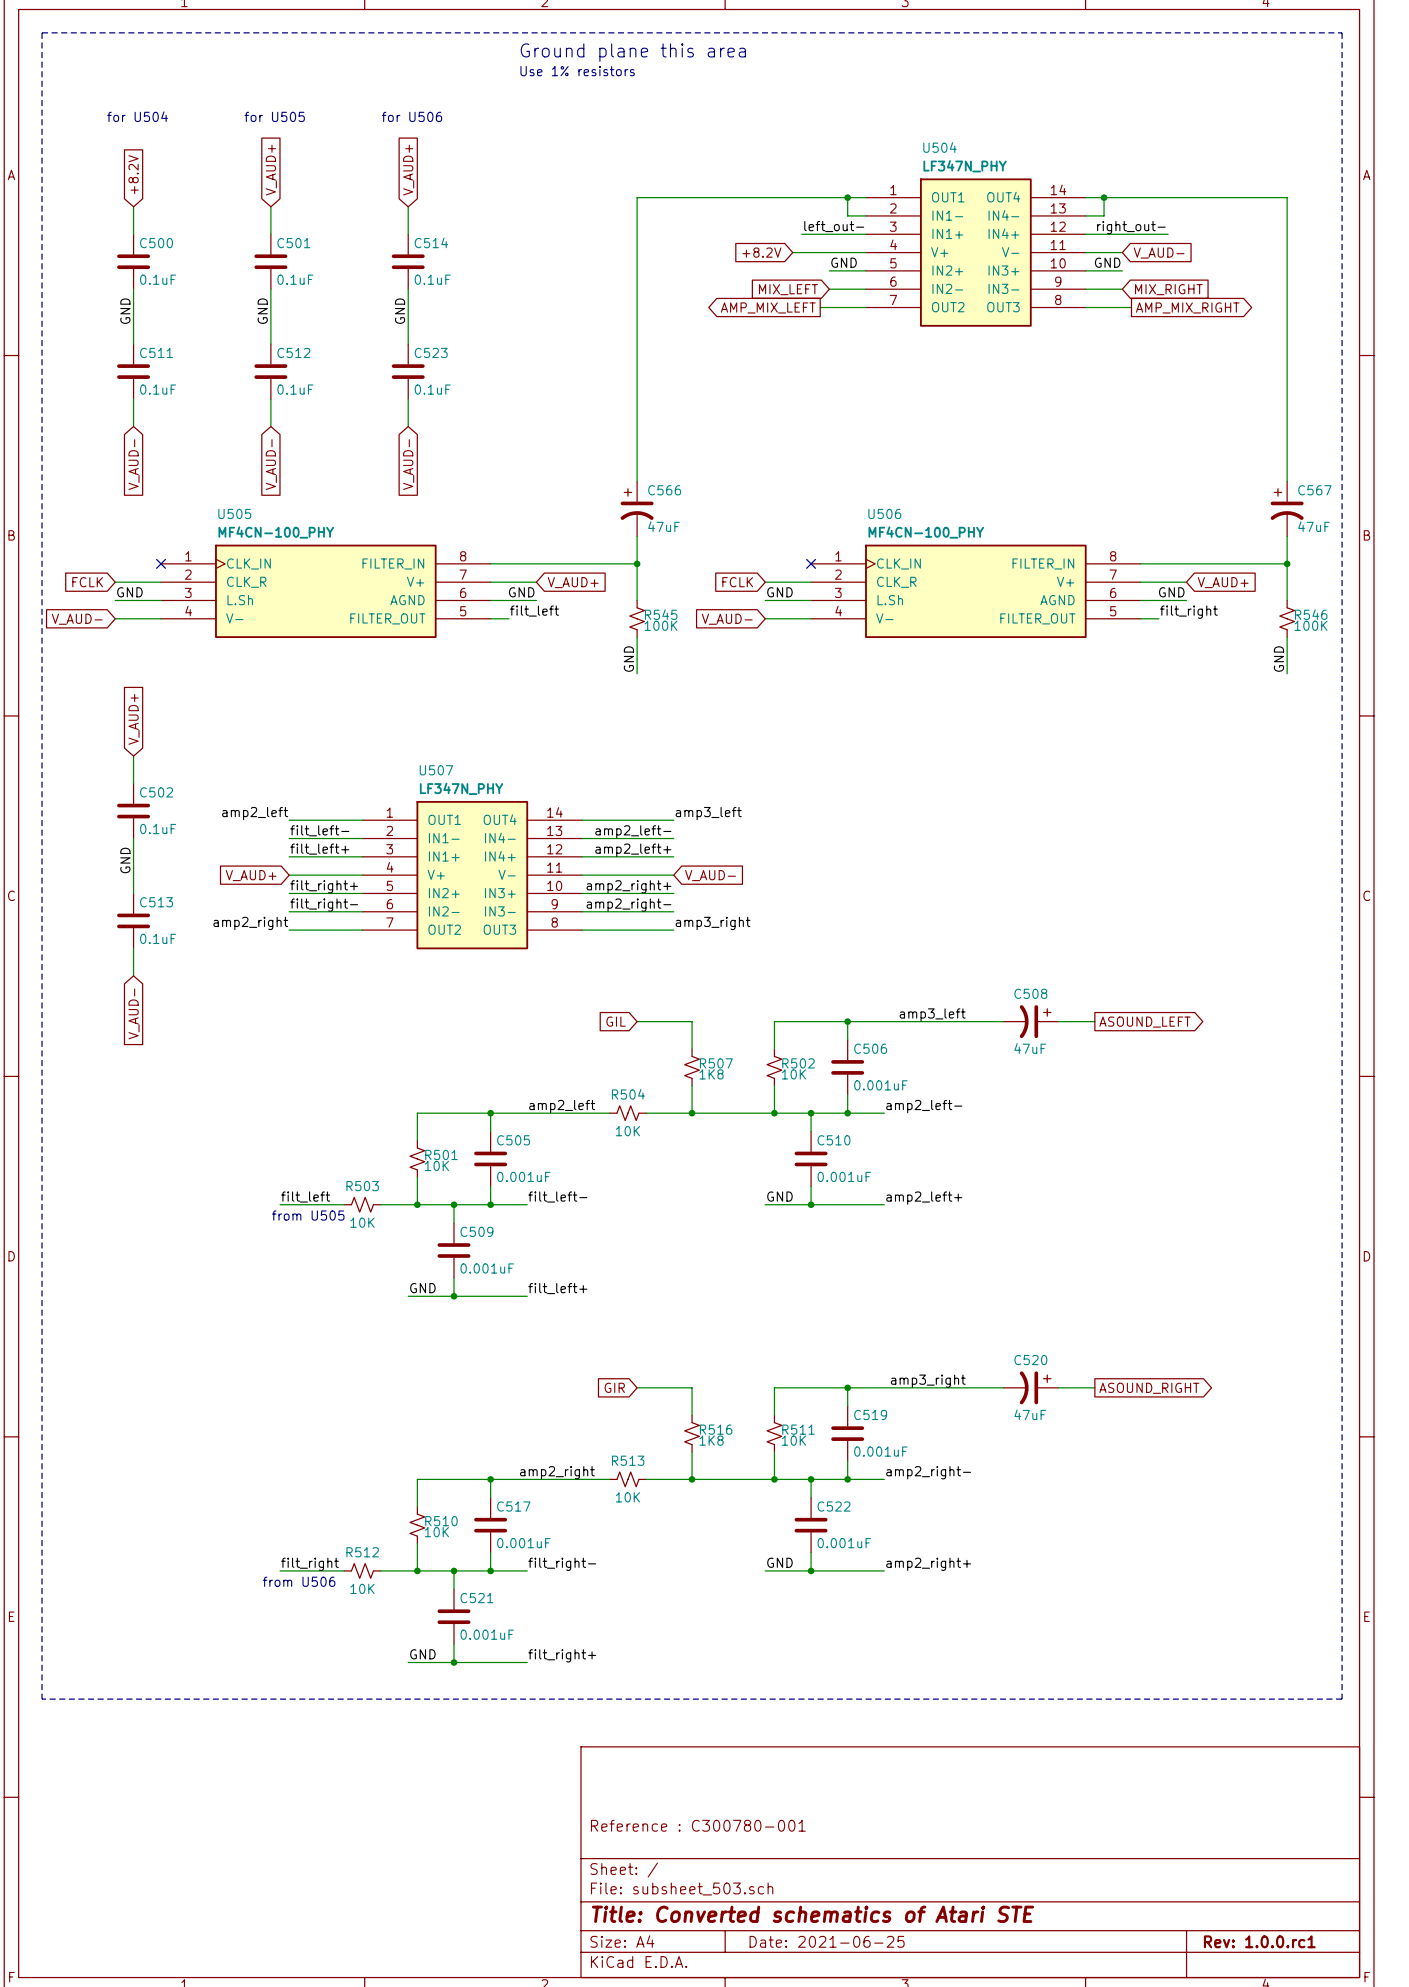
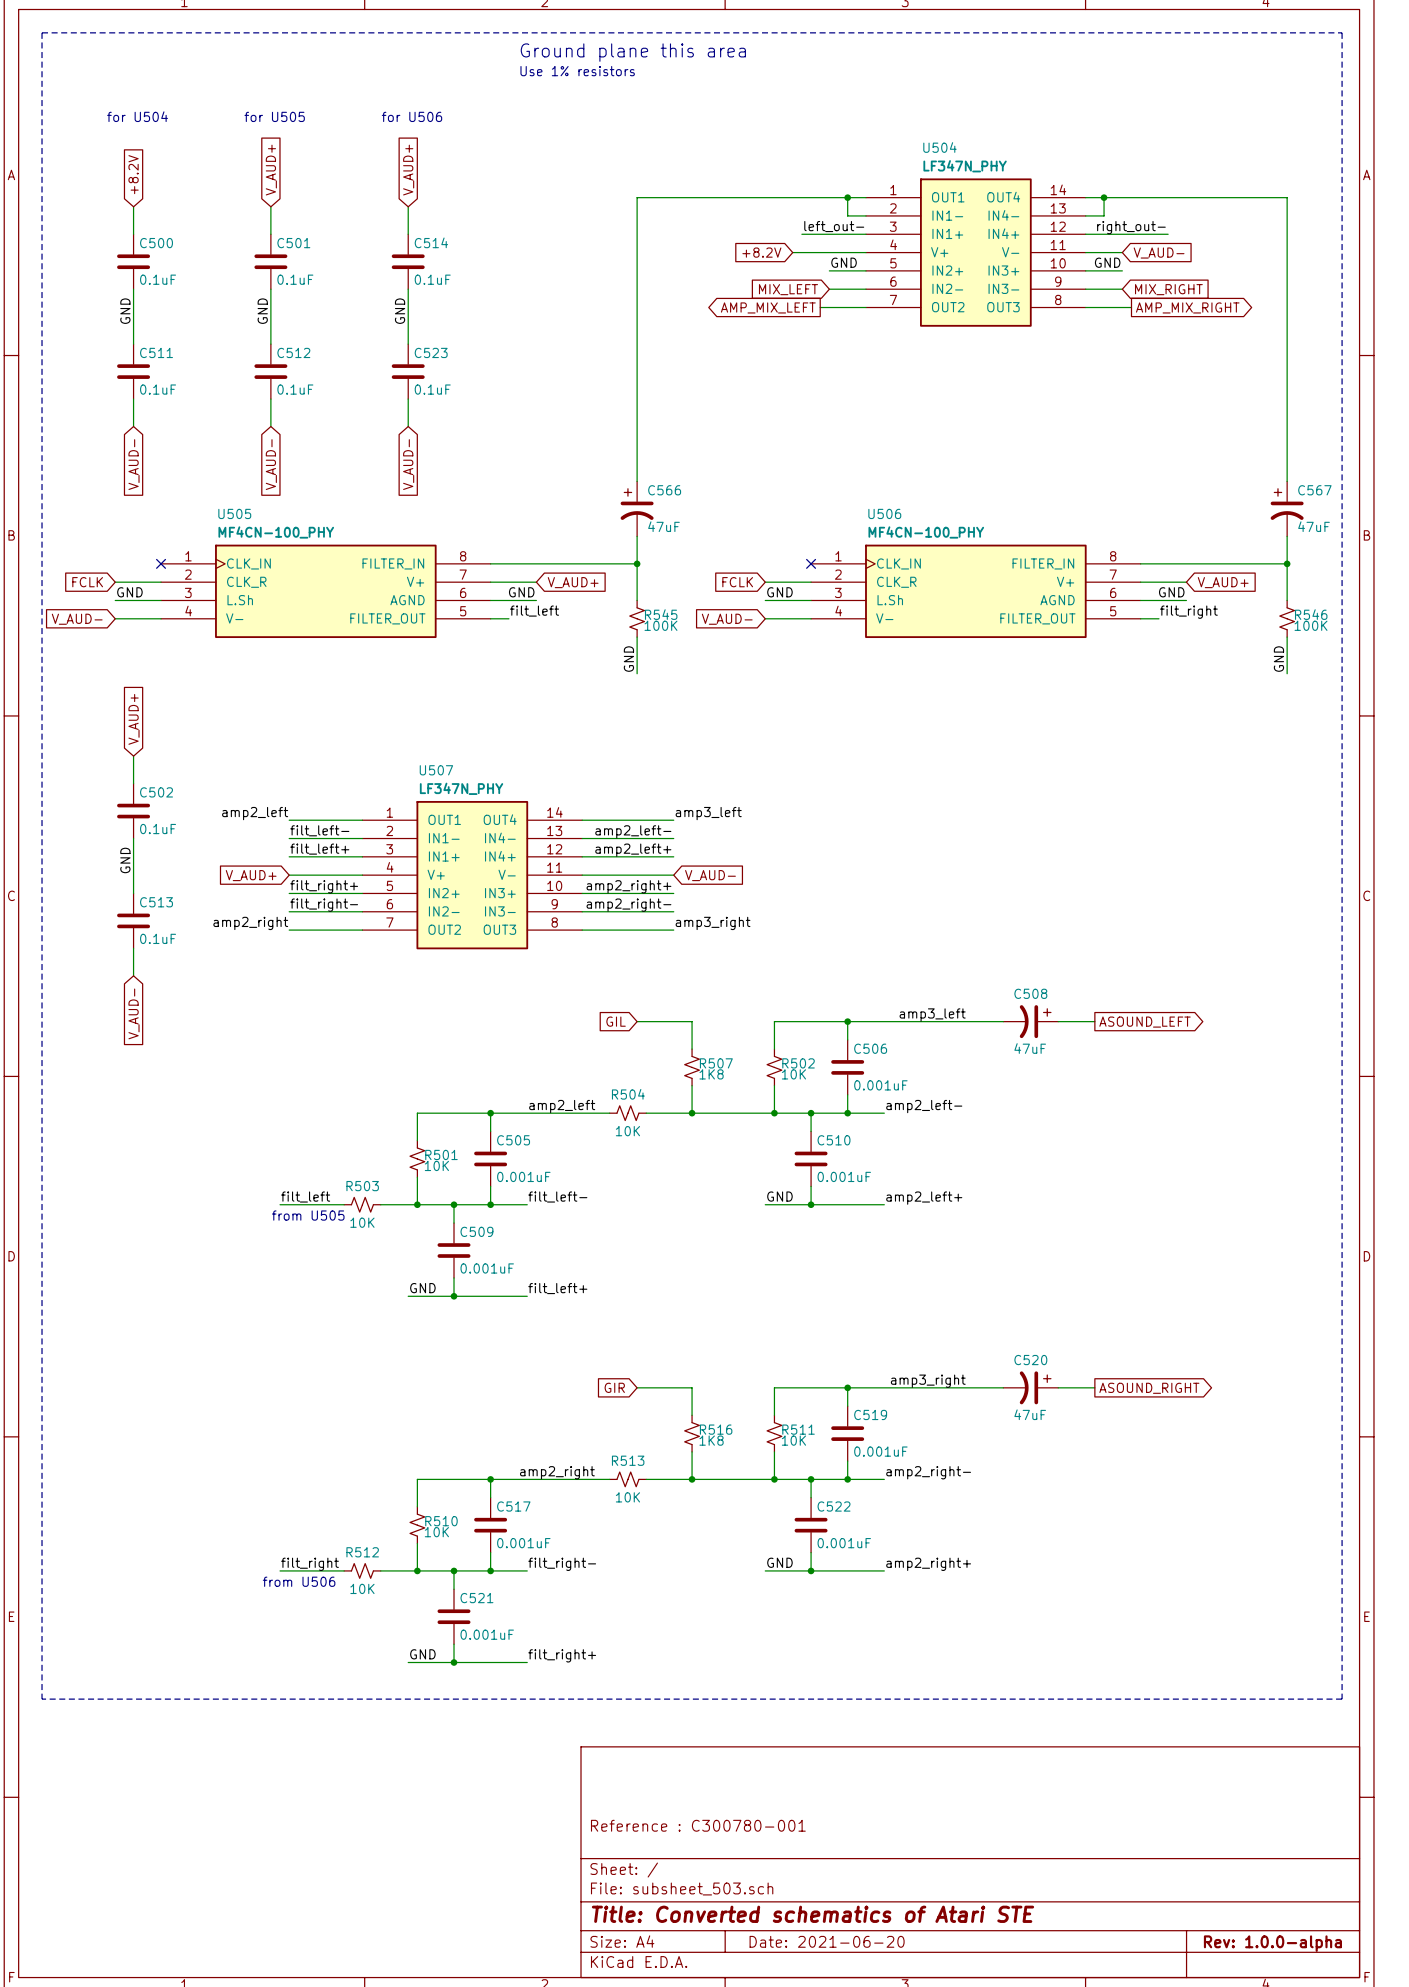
title block: Date: 2021-06-25 (827, 1941) -> Date: 2021-06-20 (827, 1941)
title block: Rev: 1.0.0.rc1 (1259, 1941) -> Rev: 1.0.0-alpha (1272, 1943)

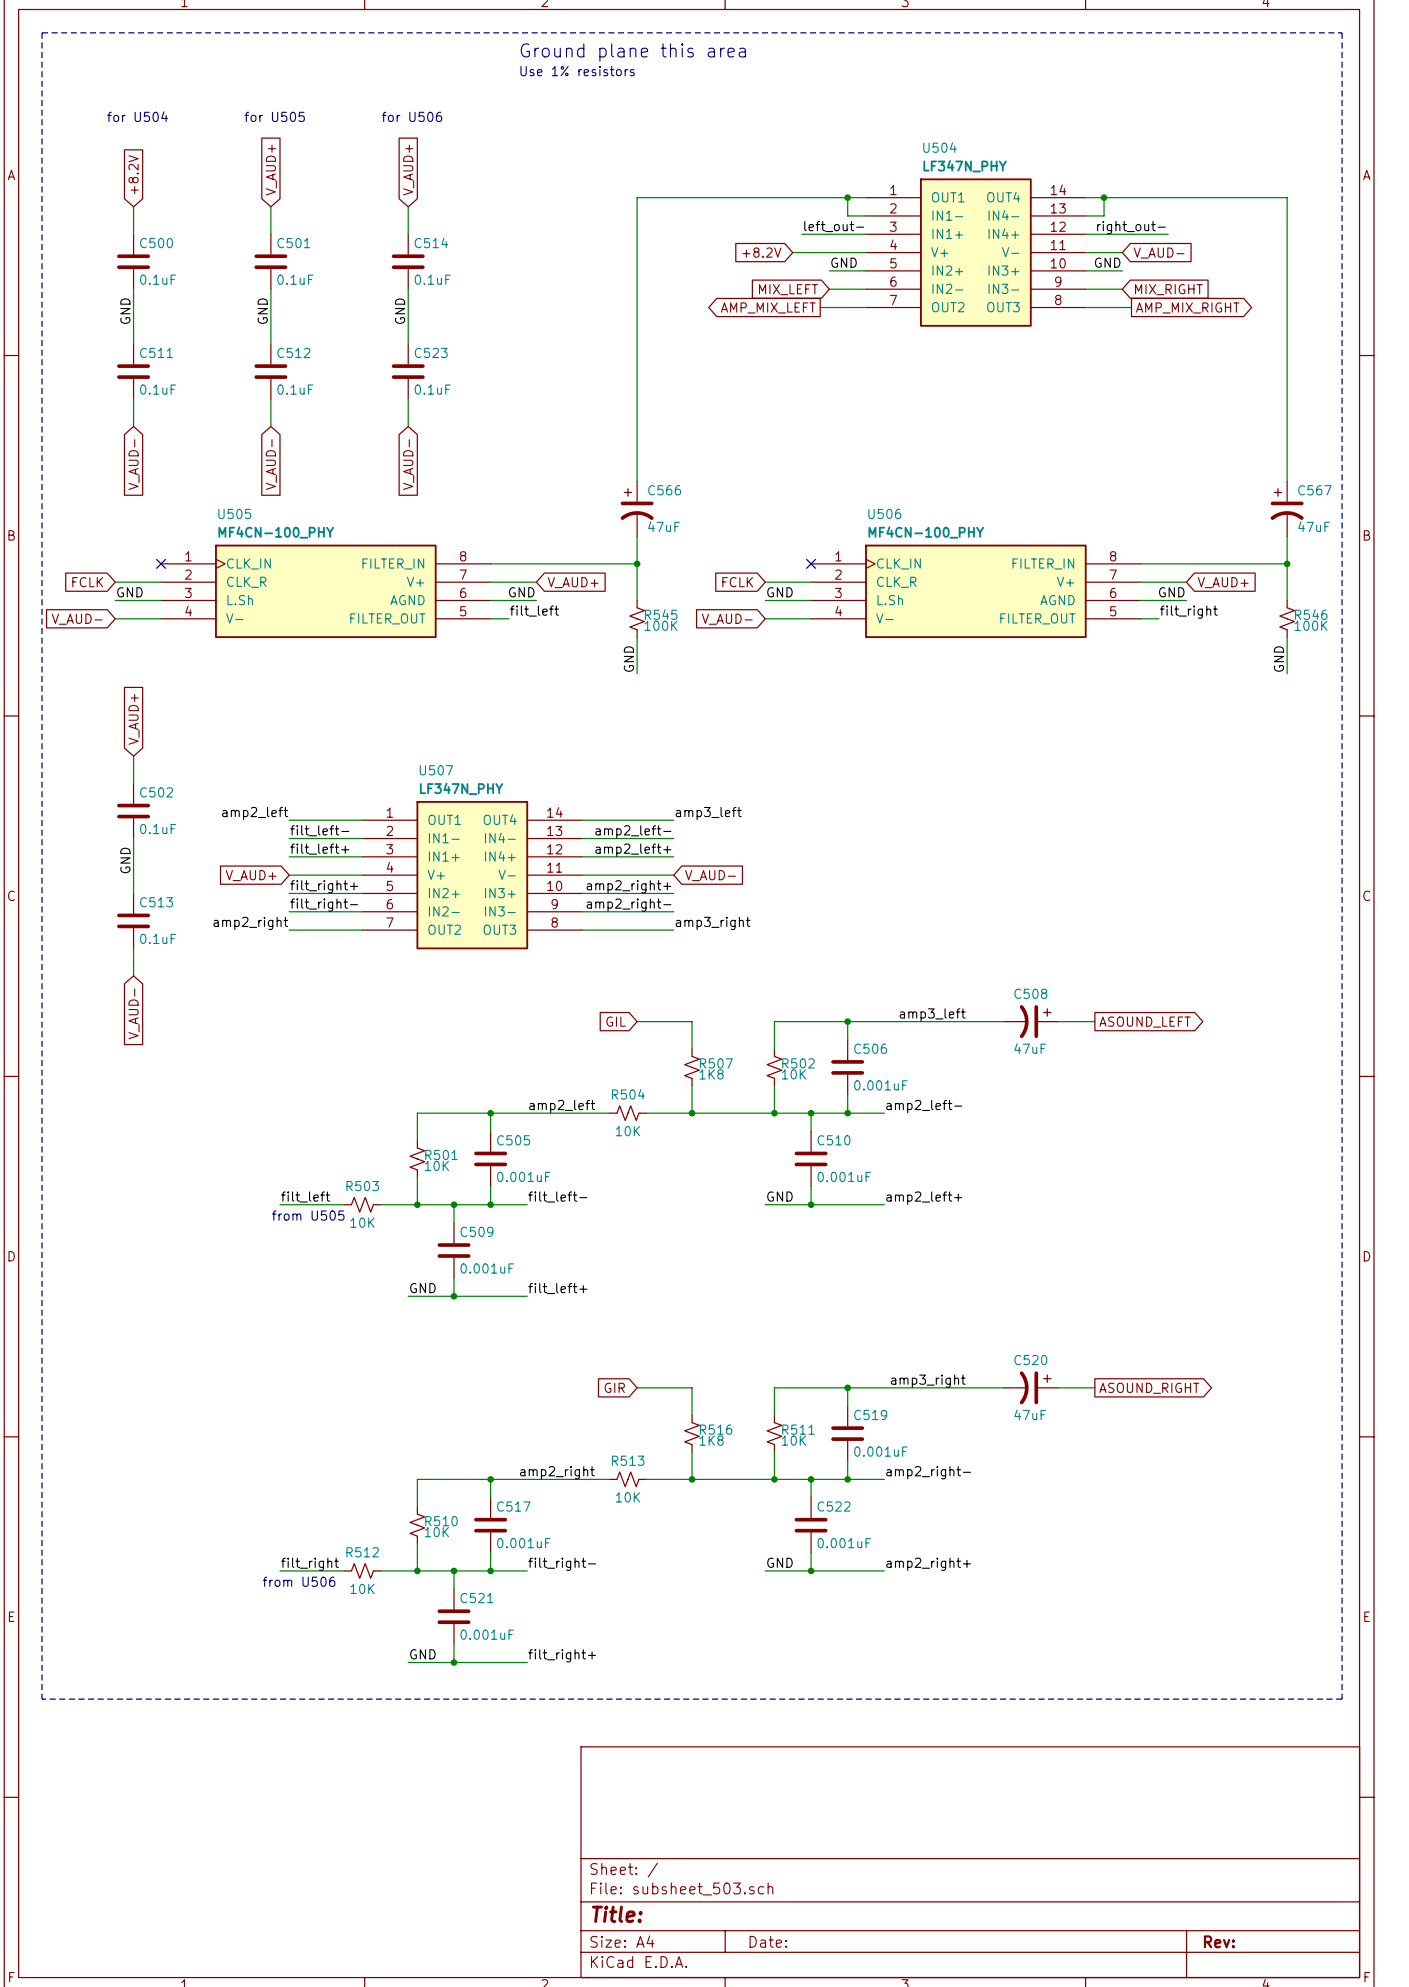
title block: Reference : C300780-001 (698, 1825) -> none
title block: Title: Converted schematics of Atari STE (812, 1914) -> Title: (617, 1914)
title block: Date: 2021-06-20 (827, 1941) -> Date: (768, 1941)
title block: Rev: 1.0.0-alpha (1272, 1943) -> Rev: (1219, 1941)

